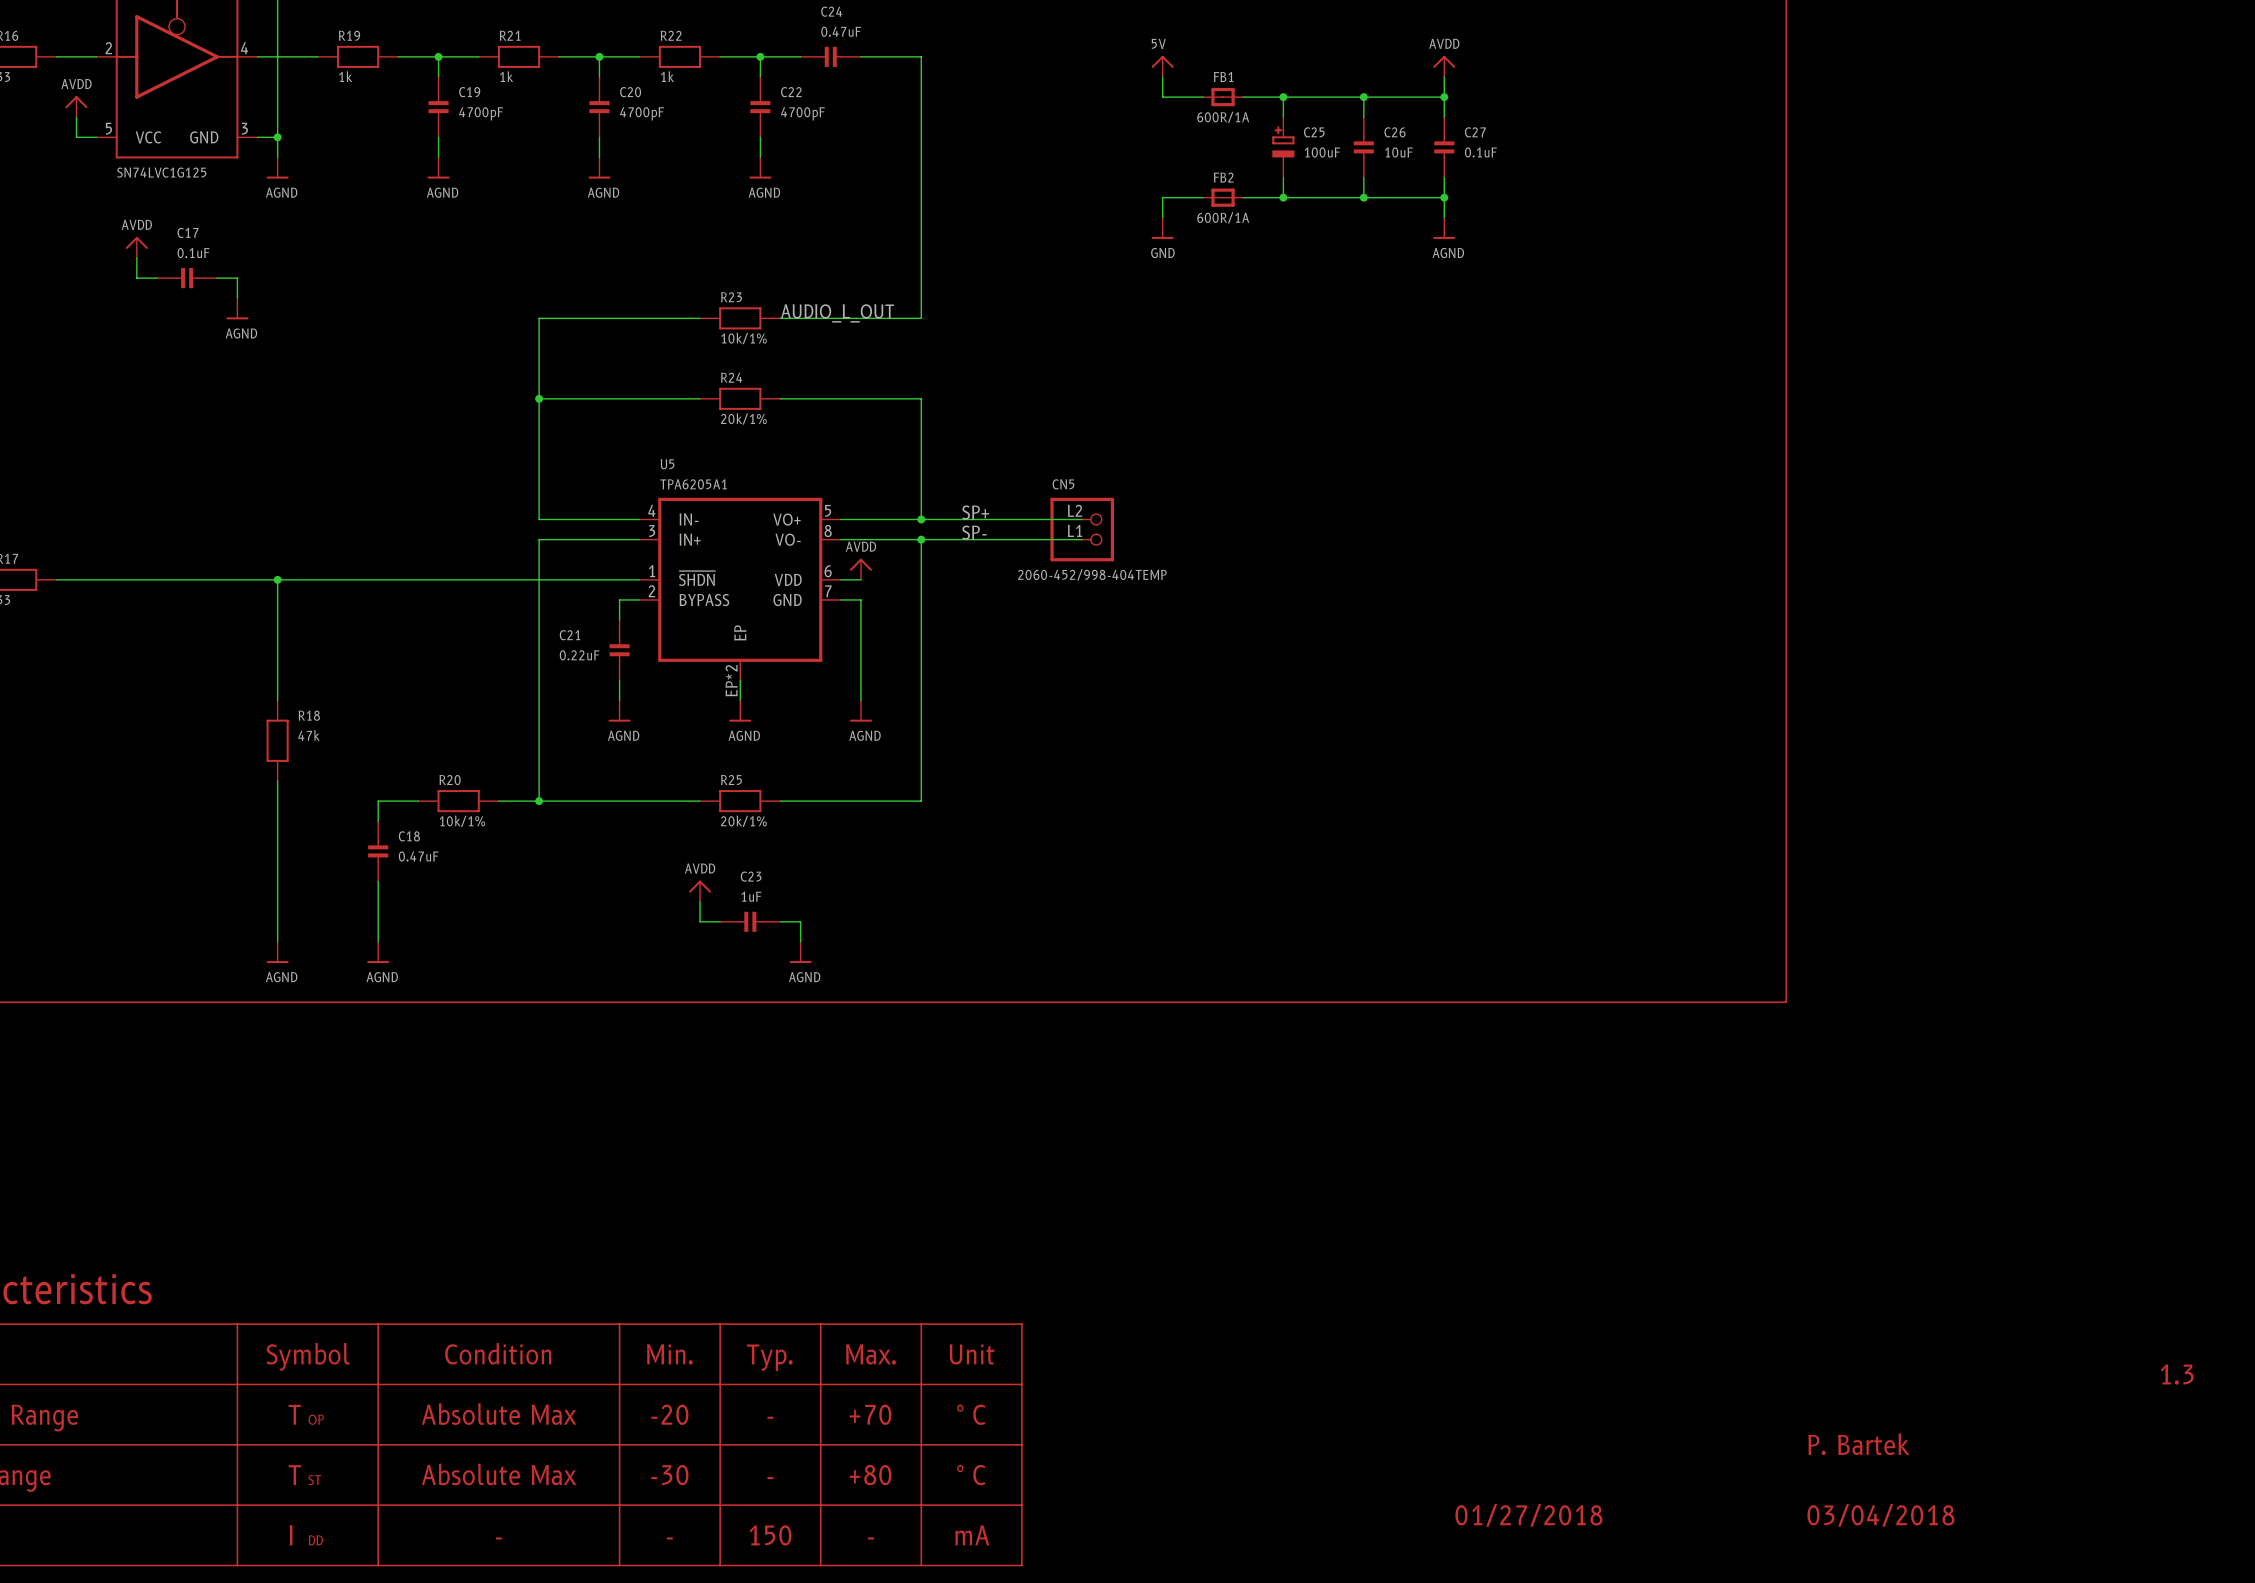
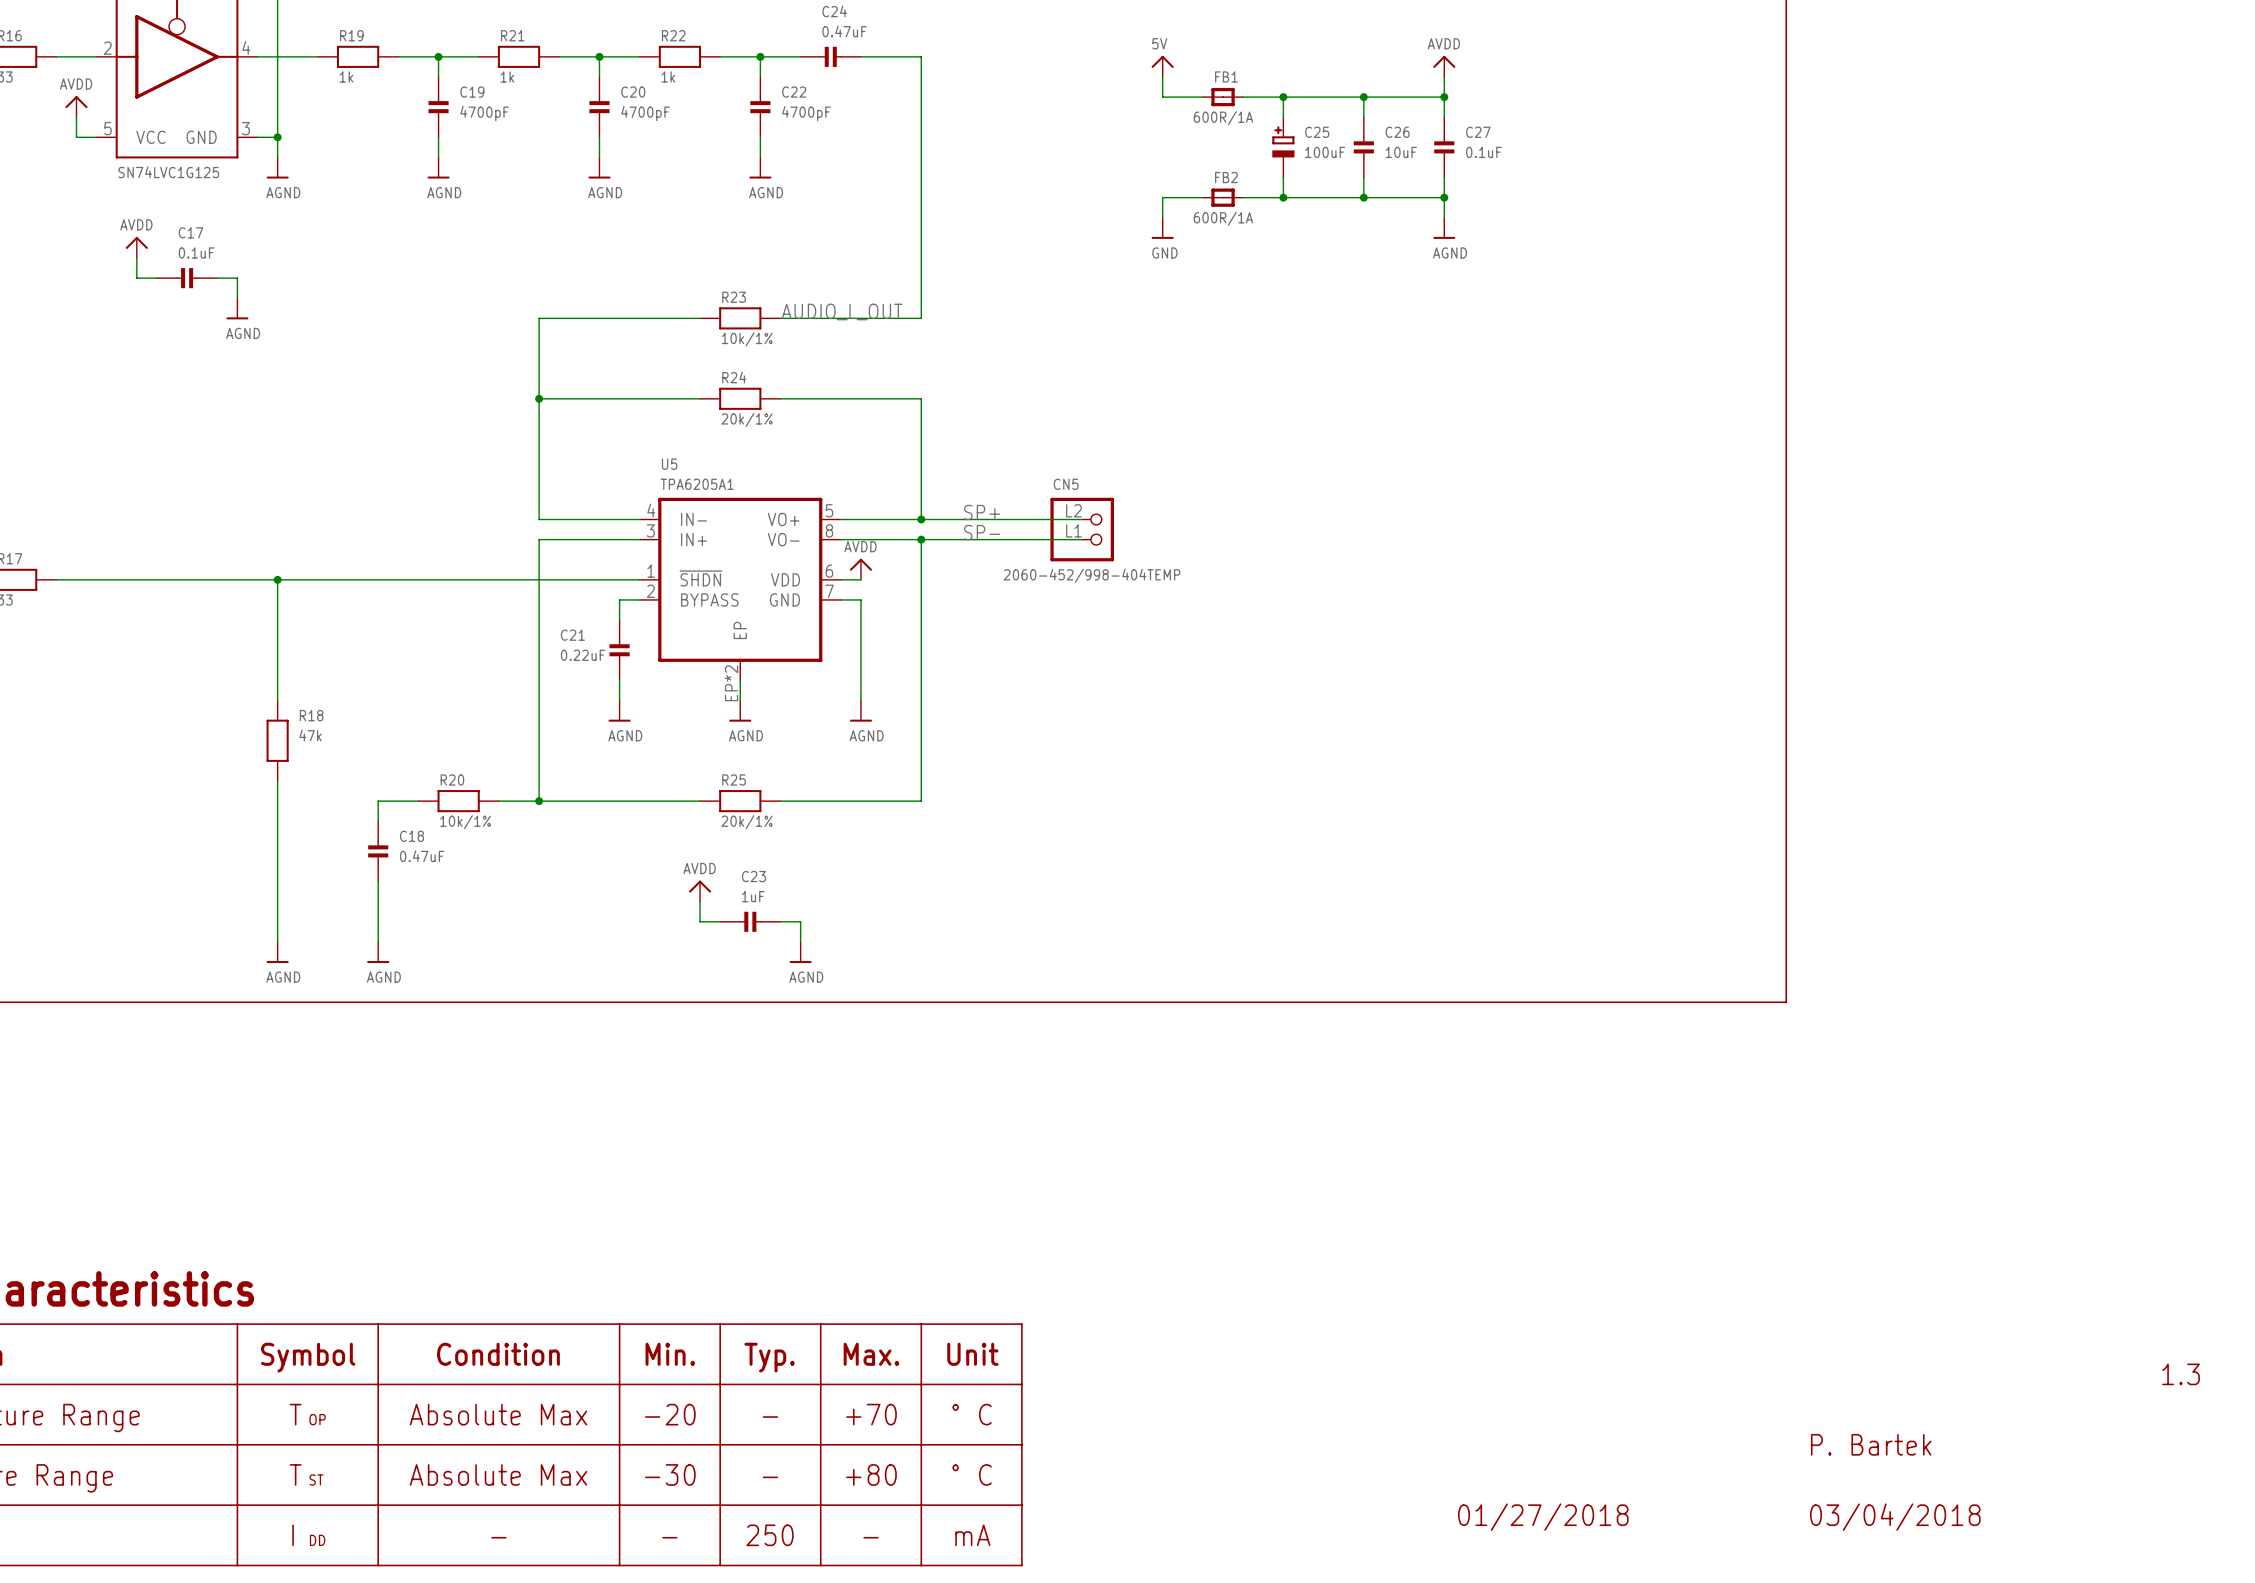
text: 150 (770, 1535) -> 250 (770, 1535)

